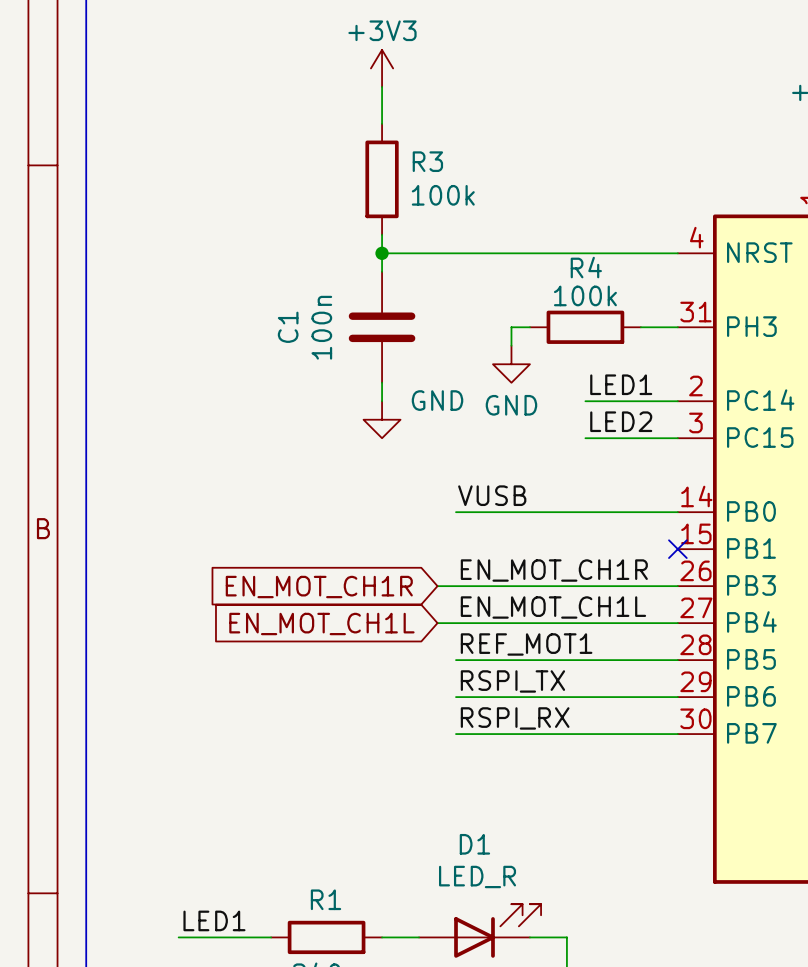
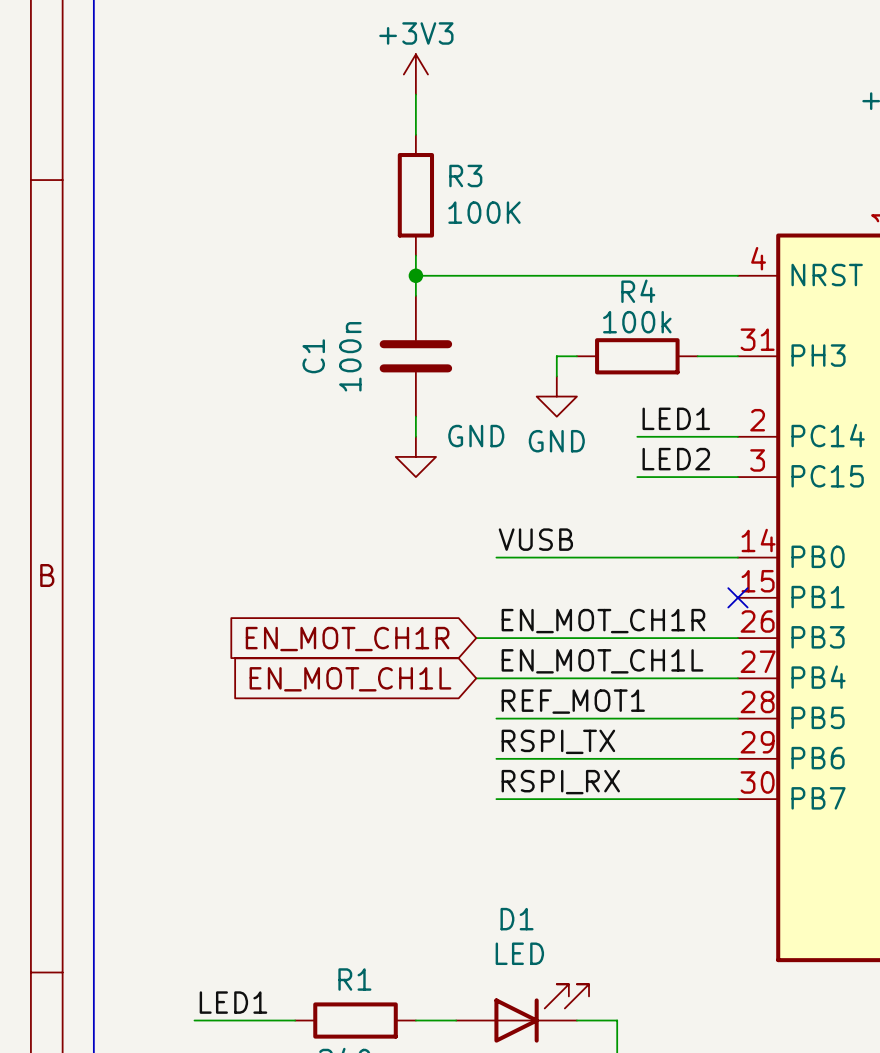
R3 value: 100k (443, 195) -> 100K (484, 212)
D1 value: LED_R (477, 876) -> LED (519, 953)

